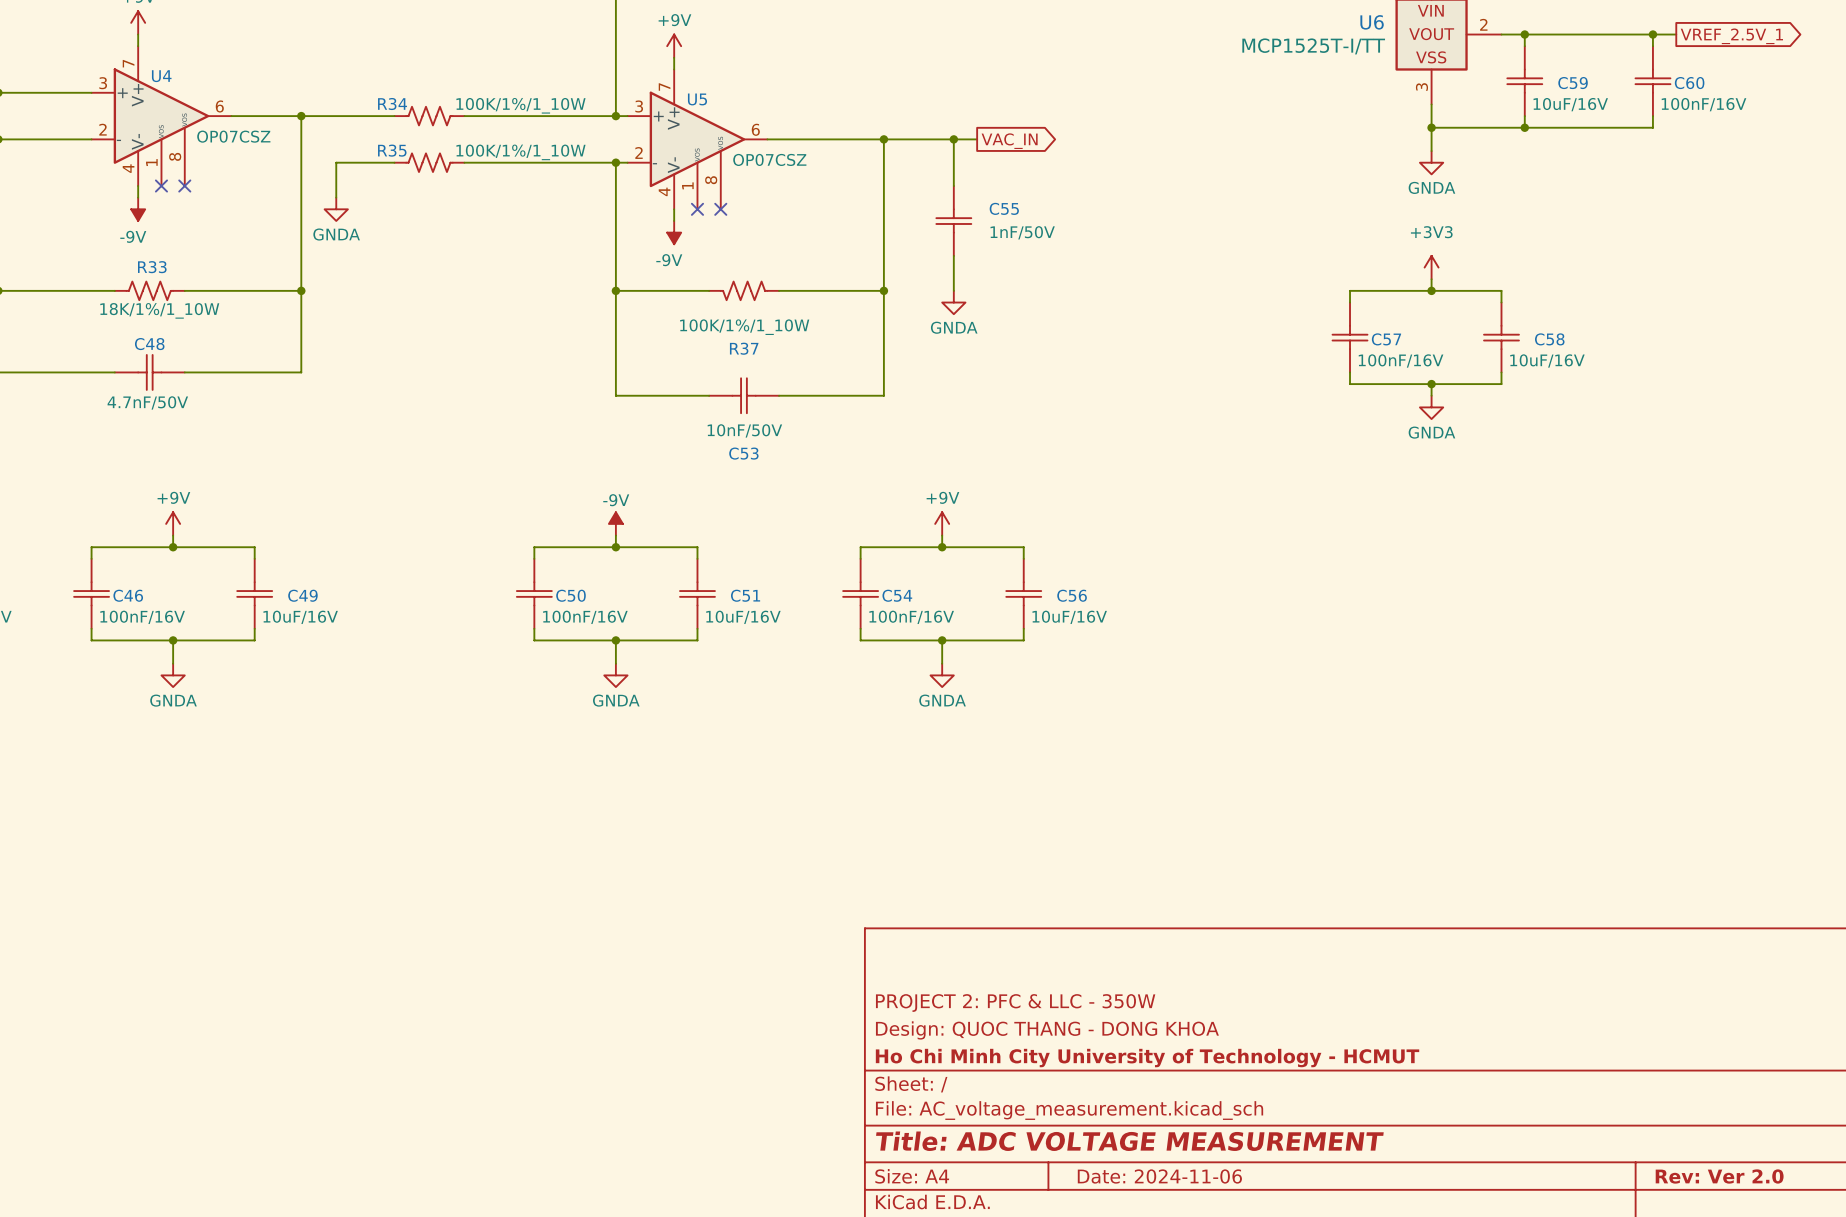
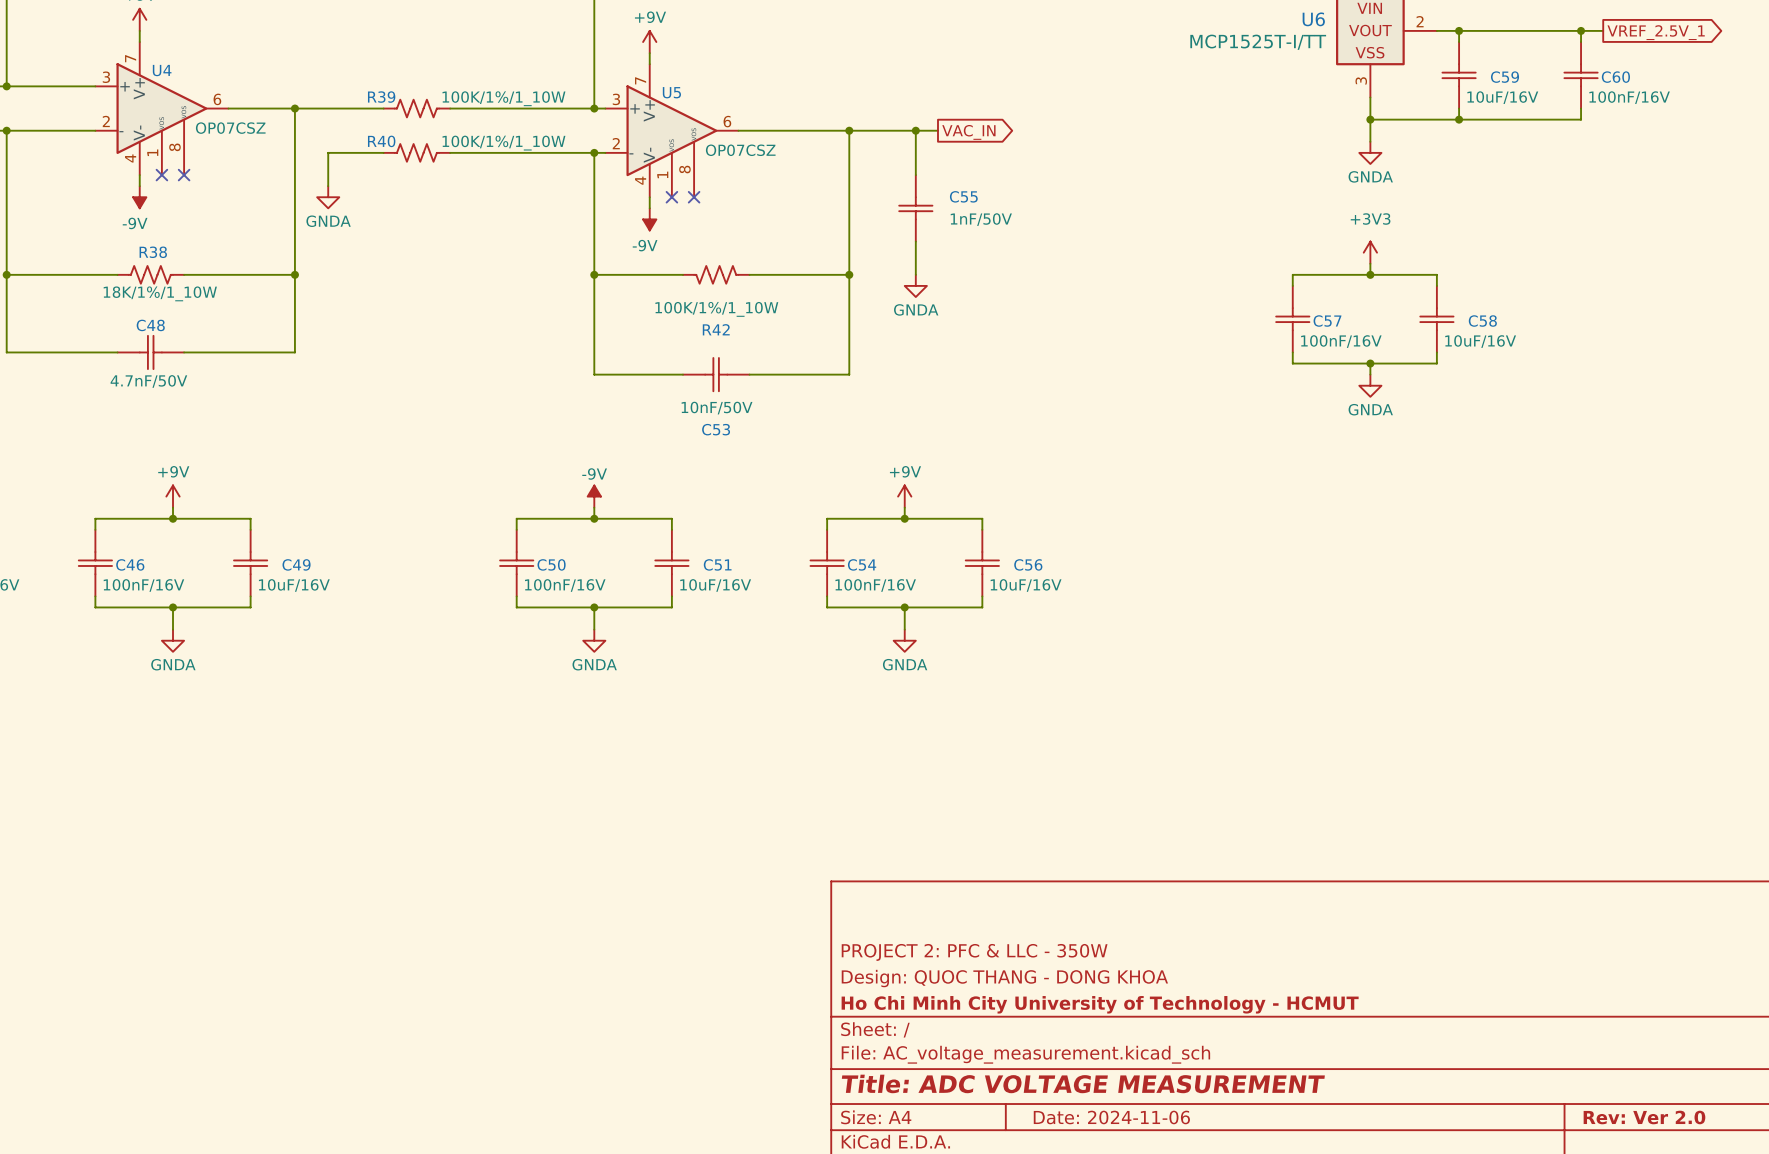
R34 name: R34 (392, 104) -> R39 (381, 97)
R35 name: R35 (392, 150) -> R40 (381, 141)
R33 name: R33 (152, 267) -> R38 (153, 252)
R37 name: R37 (744, 348) -> R42 (716, 329)

